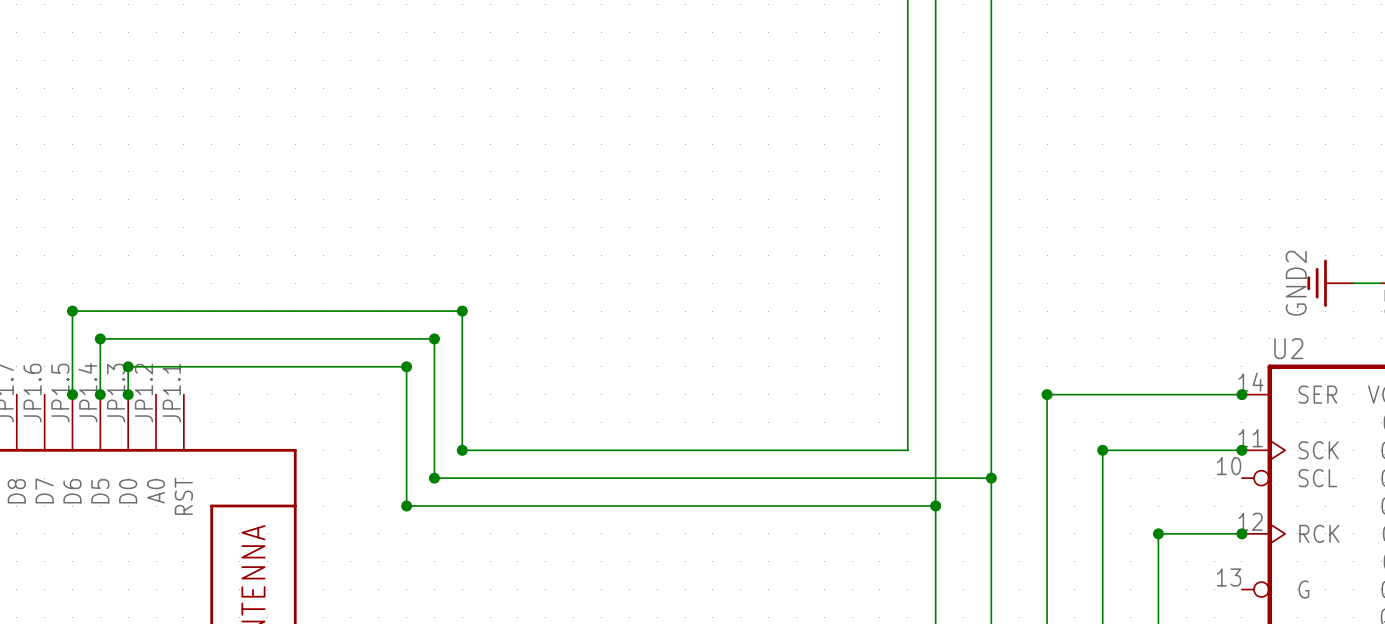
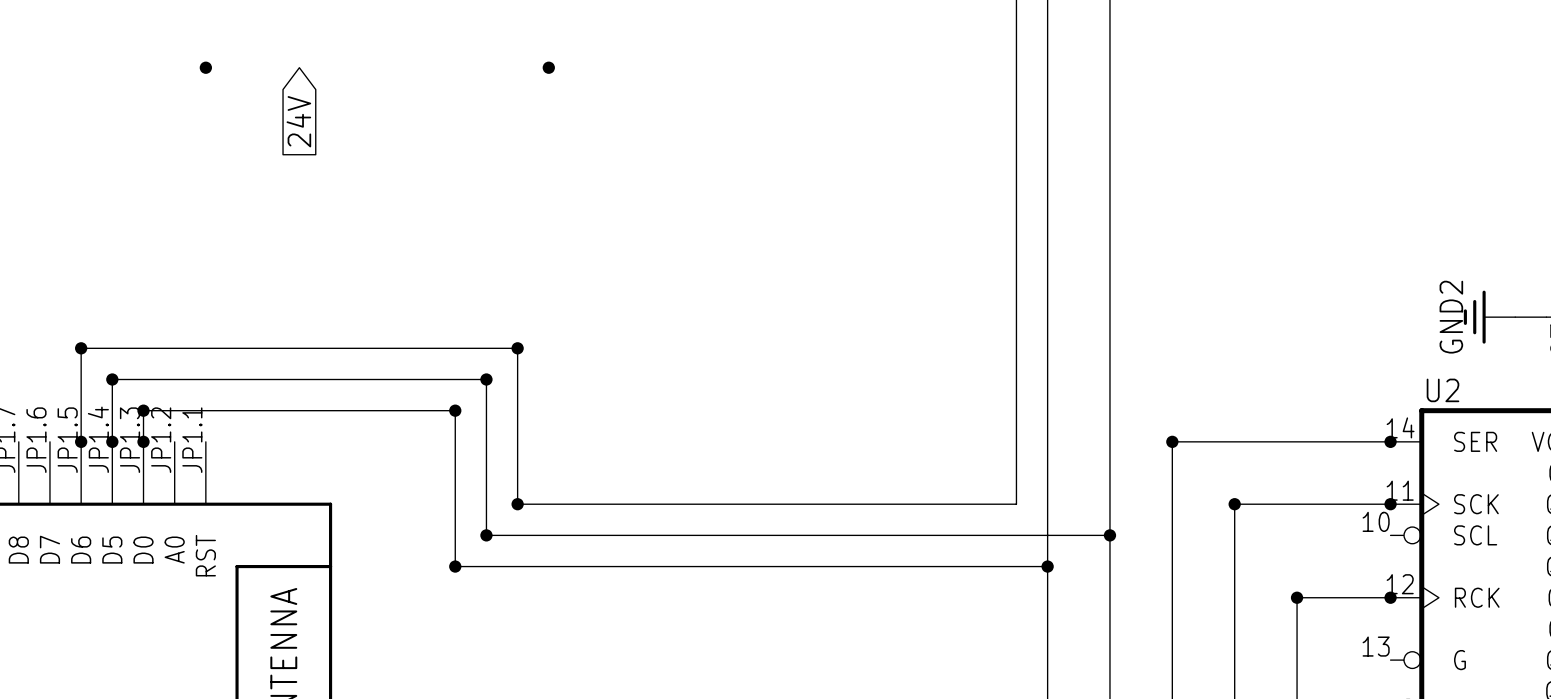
junction: none -> (205, 67)
junction: none -> (548, 67)
global label: none -> 24V (298, 121)

